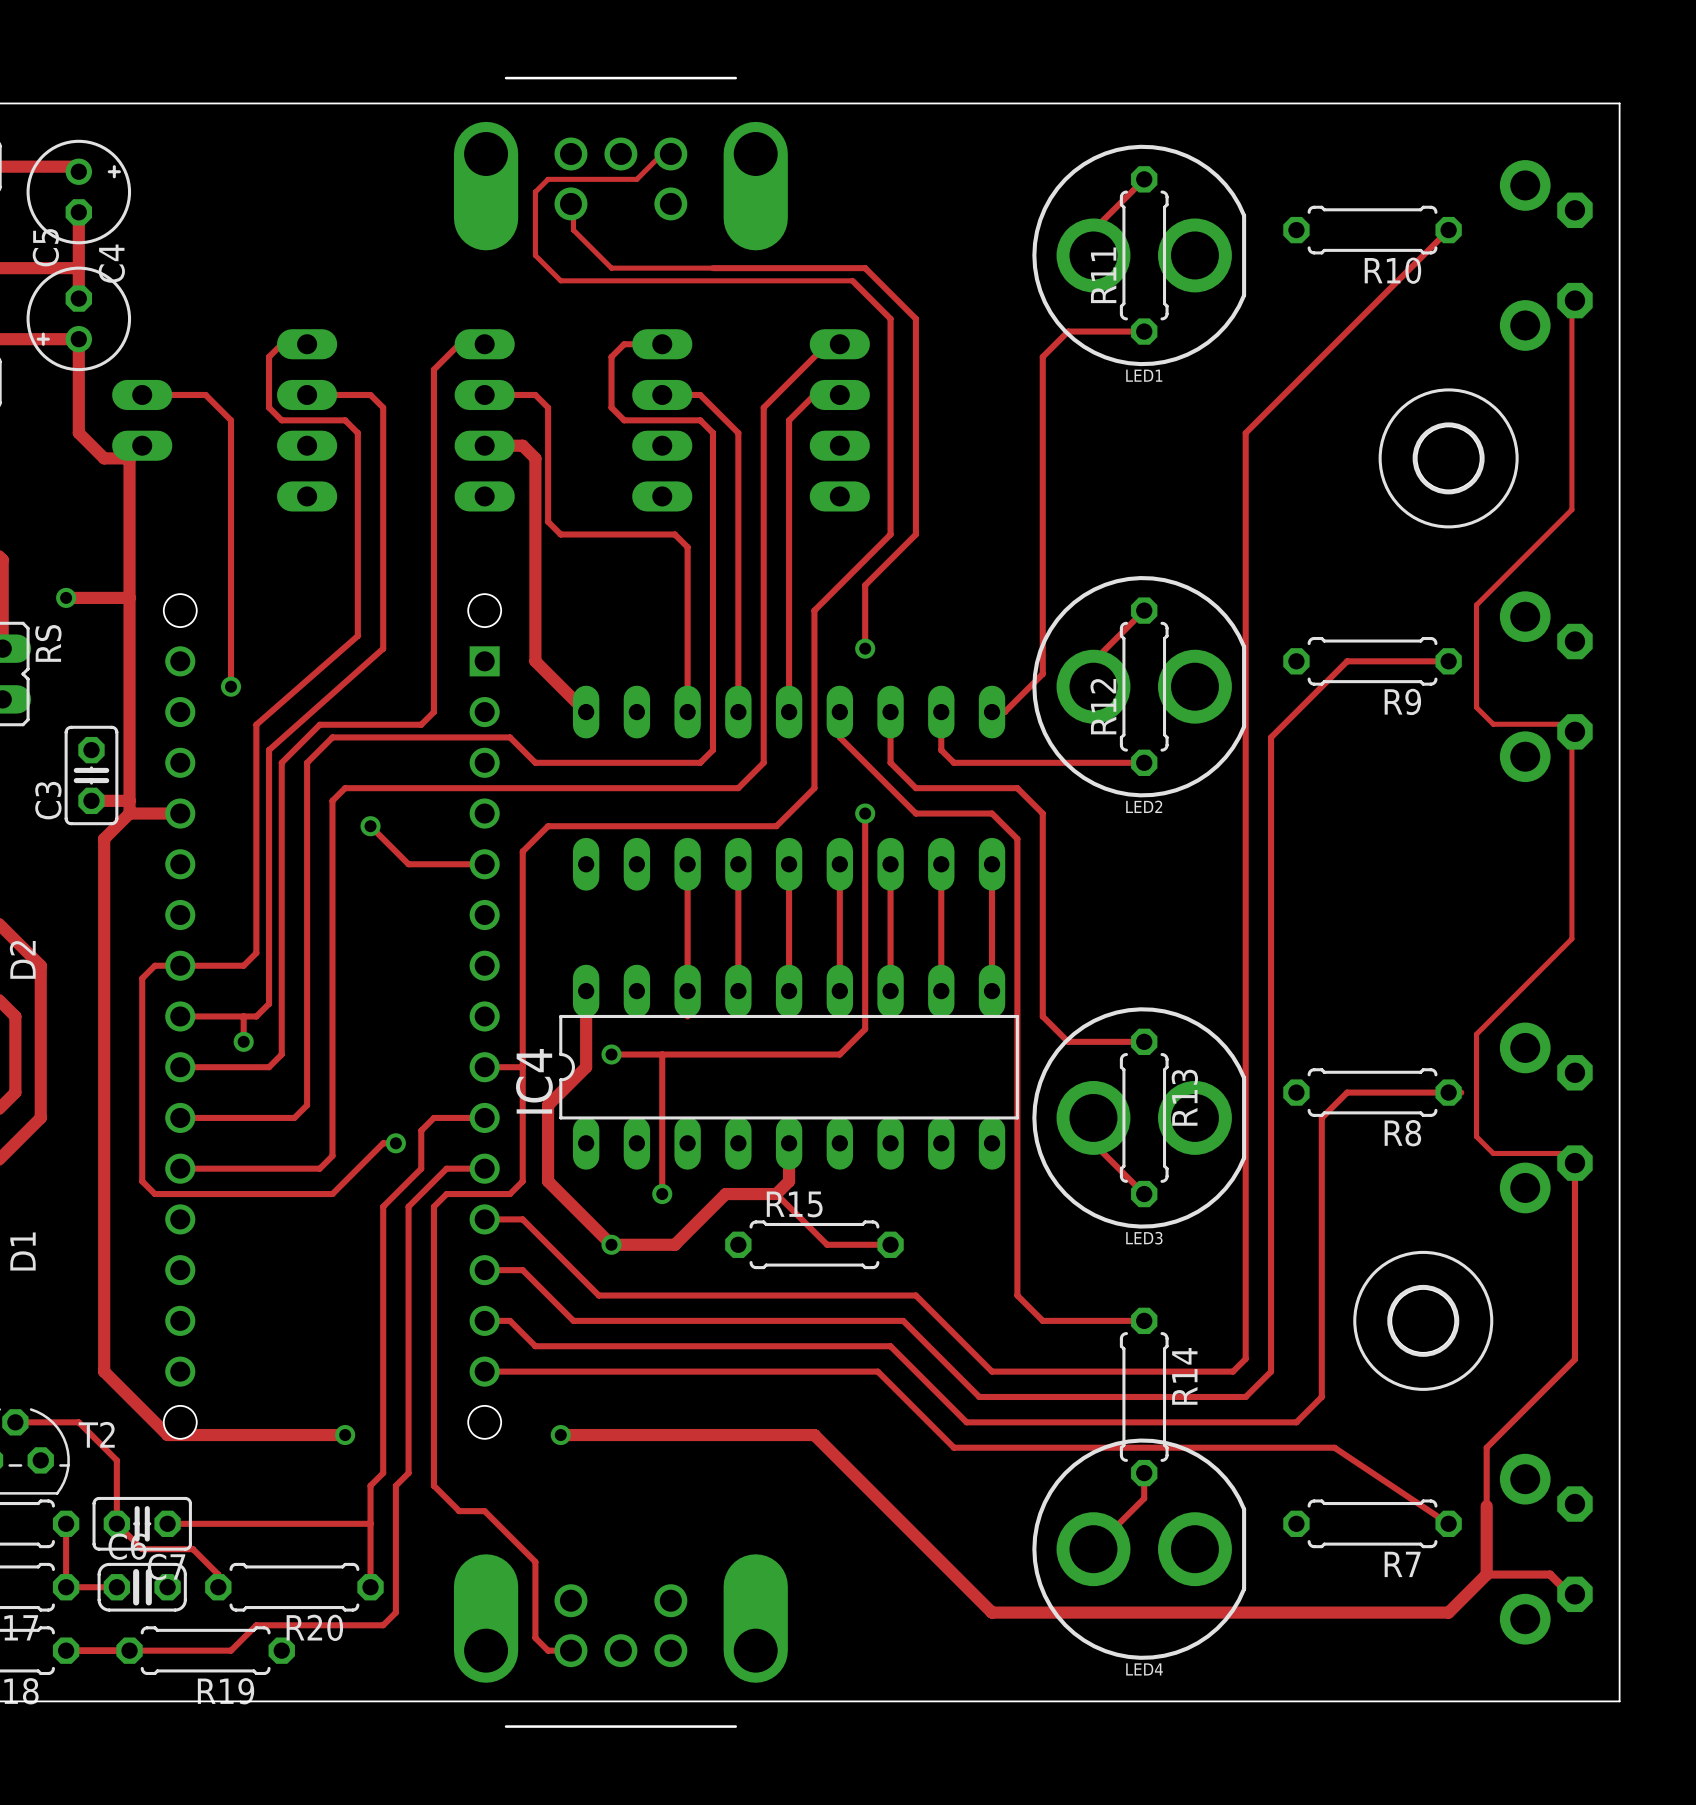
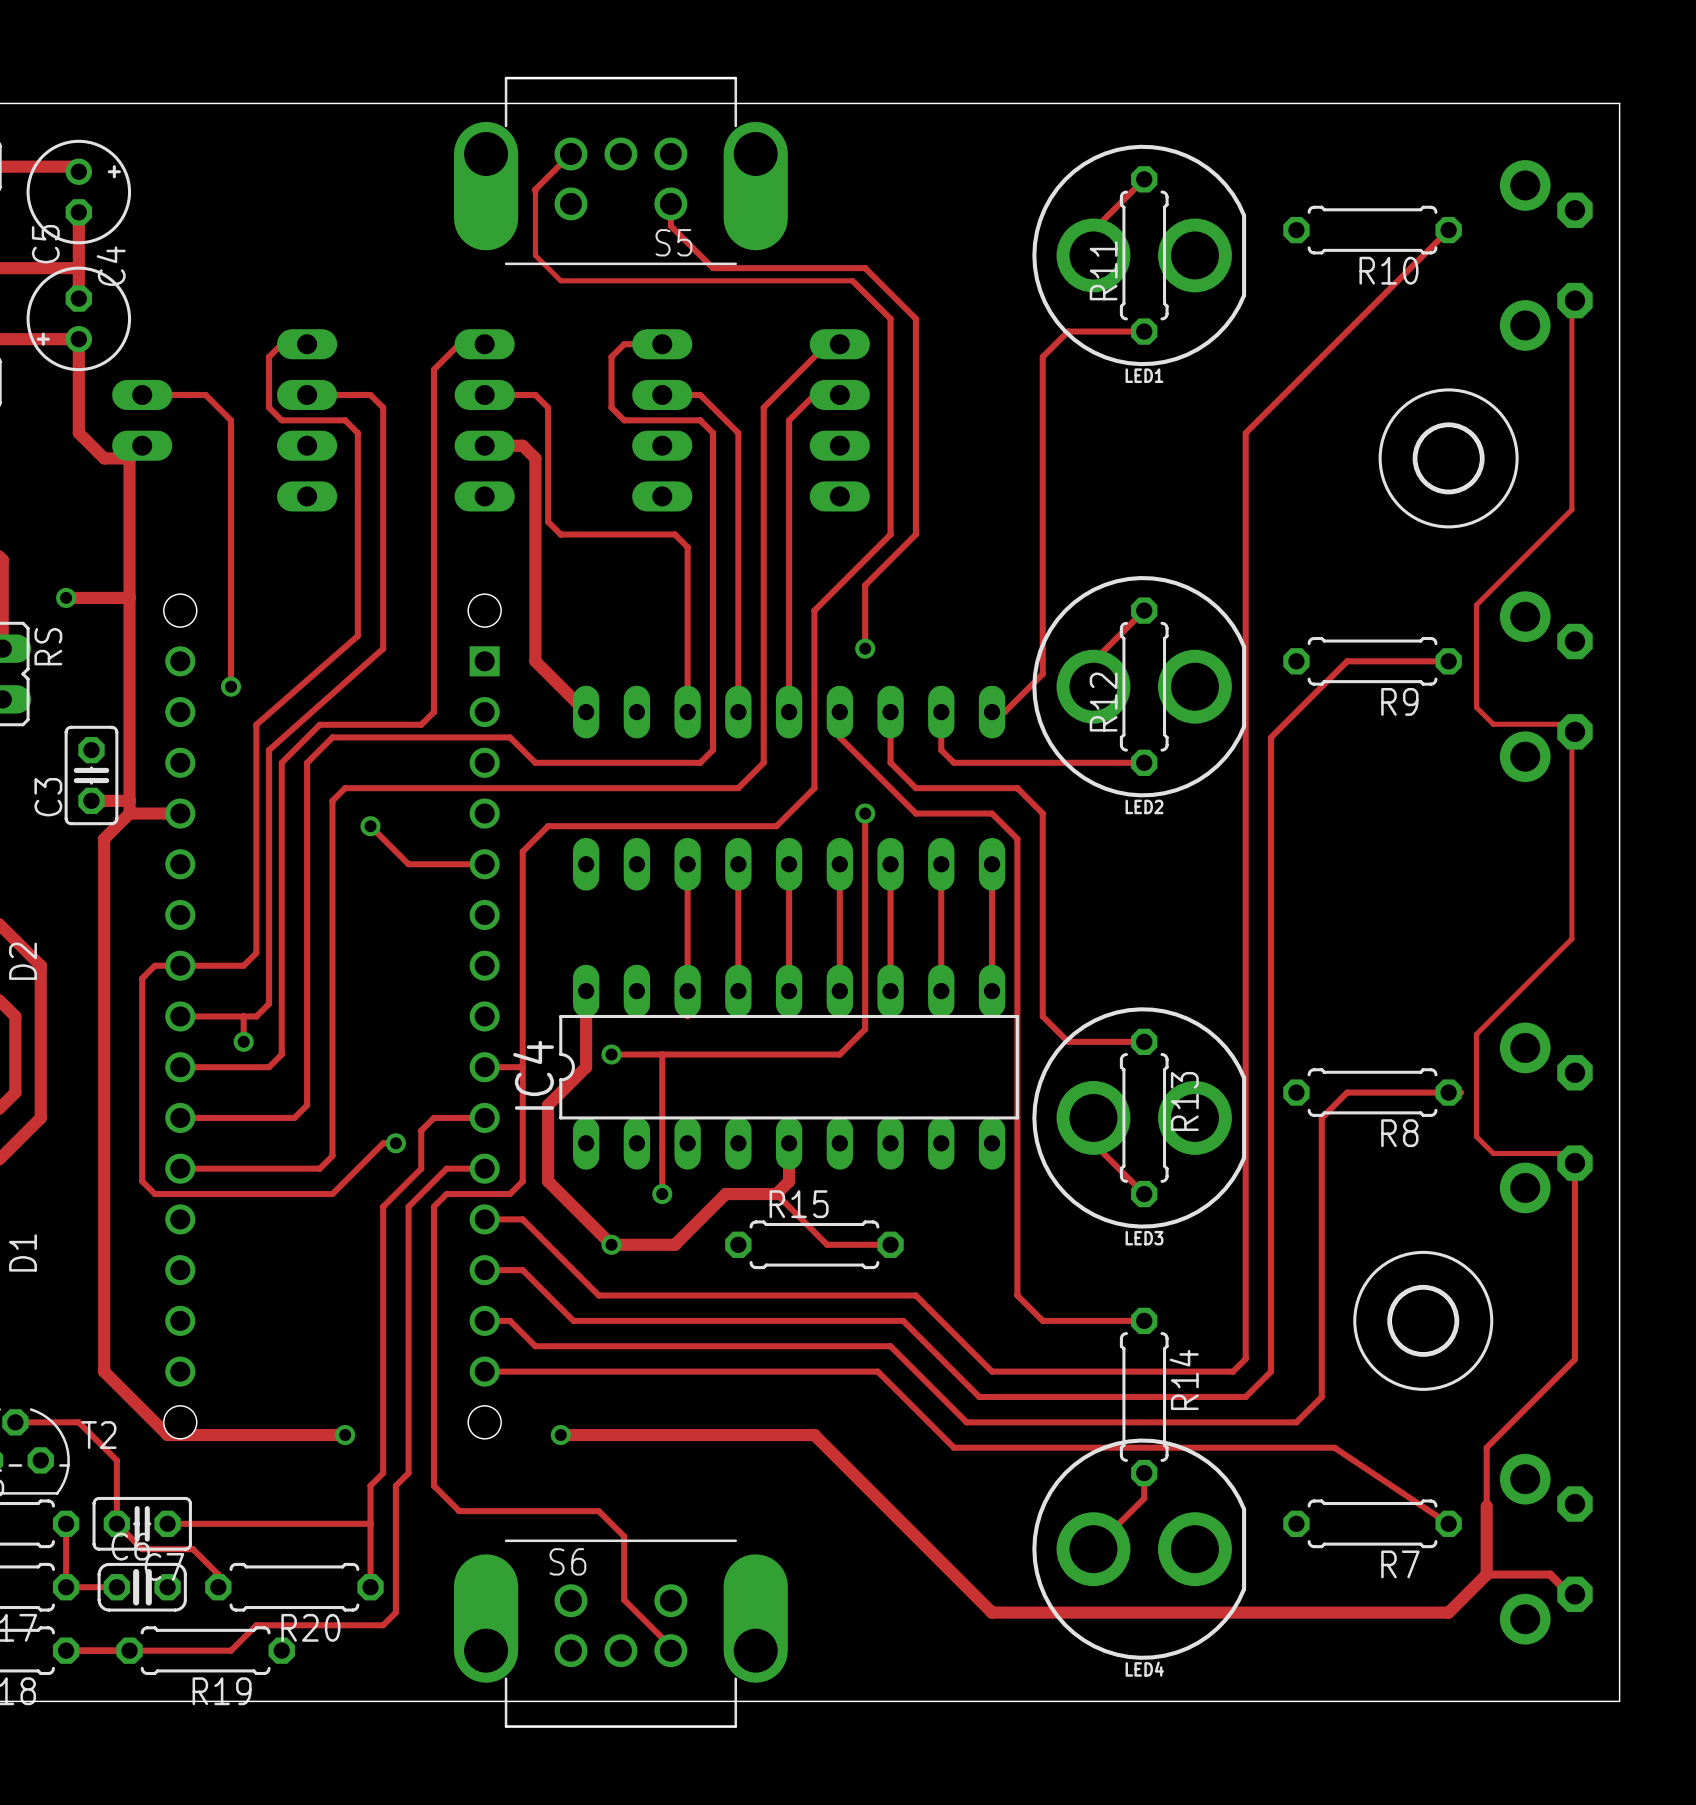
track: (670, 153) (662, 153) (636, 179) (548, 179) (535, 192) -> (570, 153) (535, 189) (535, 192)
S5 side: bottom (620, 163) -> top (620, 170)
track: (570, 203) (573, 206) (573, 230) (611, 268) (712, 268) -> (670, 203) (670, 225) (712, 268)
track: (484, 1511) (535, 1561) (535, 1637) (548, 1650) (570, 1650) -> (484, 1511) (598, 1511) (624, 1536) (624, 1599) (670, 1646) (670, 1650)
S6 side: bottom (620, 1641) -> top (620, 1633)

